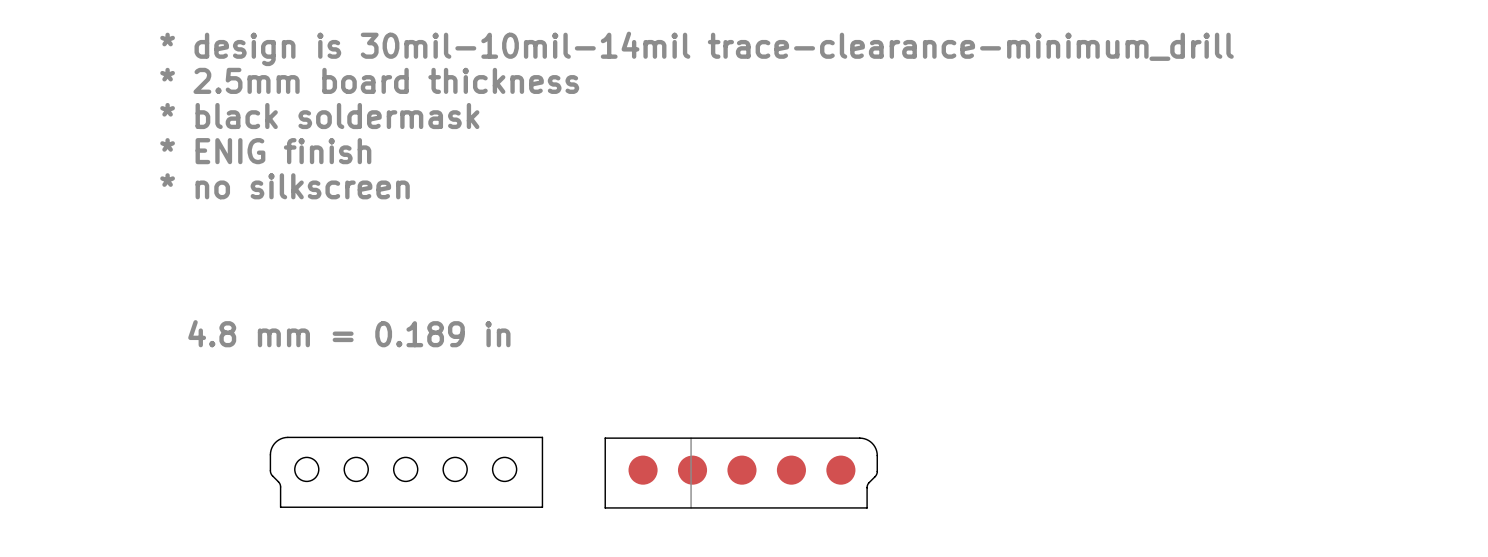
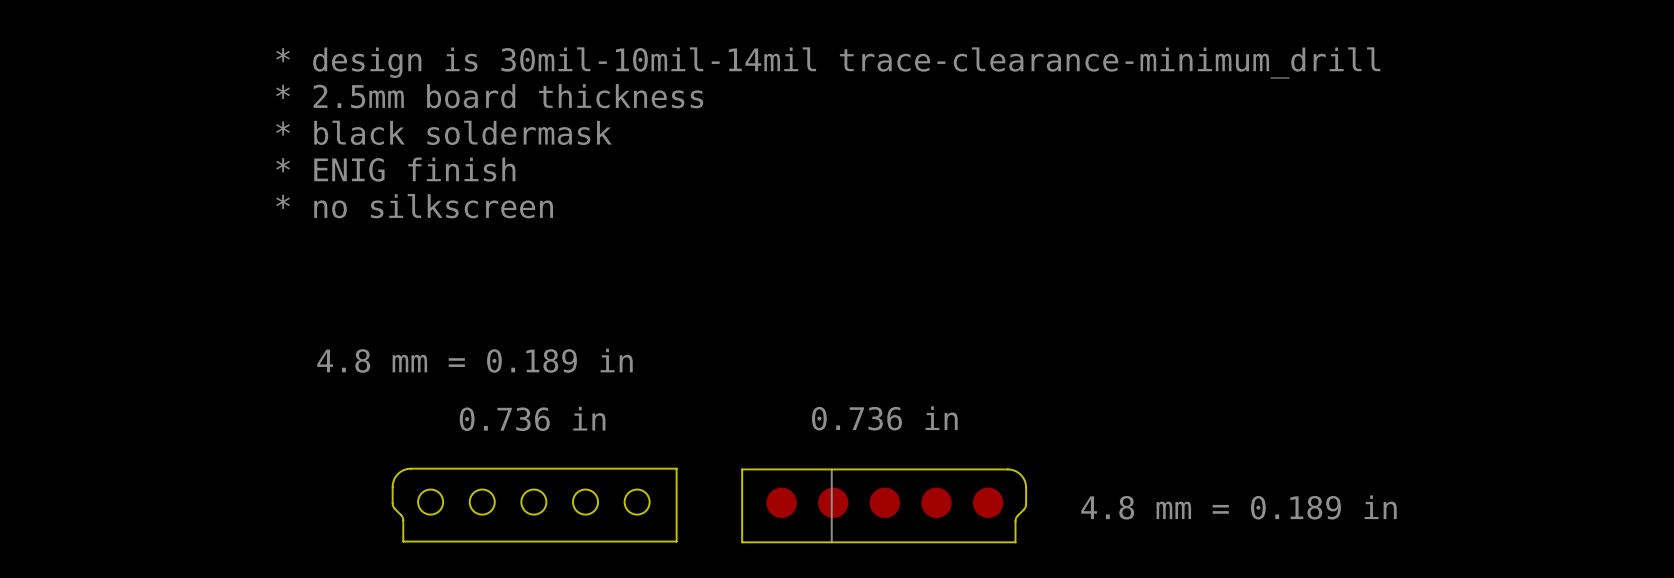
text: none -> 0.736 in (884, 418)
text: none -> 0.736 in (532, 418)
text: none -> 4.8 mm = 0.189 in (1238, 507)

